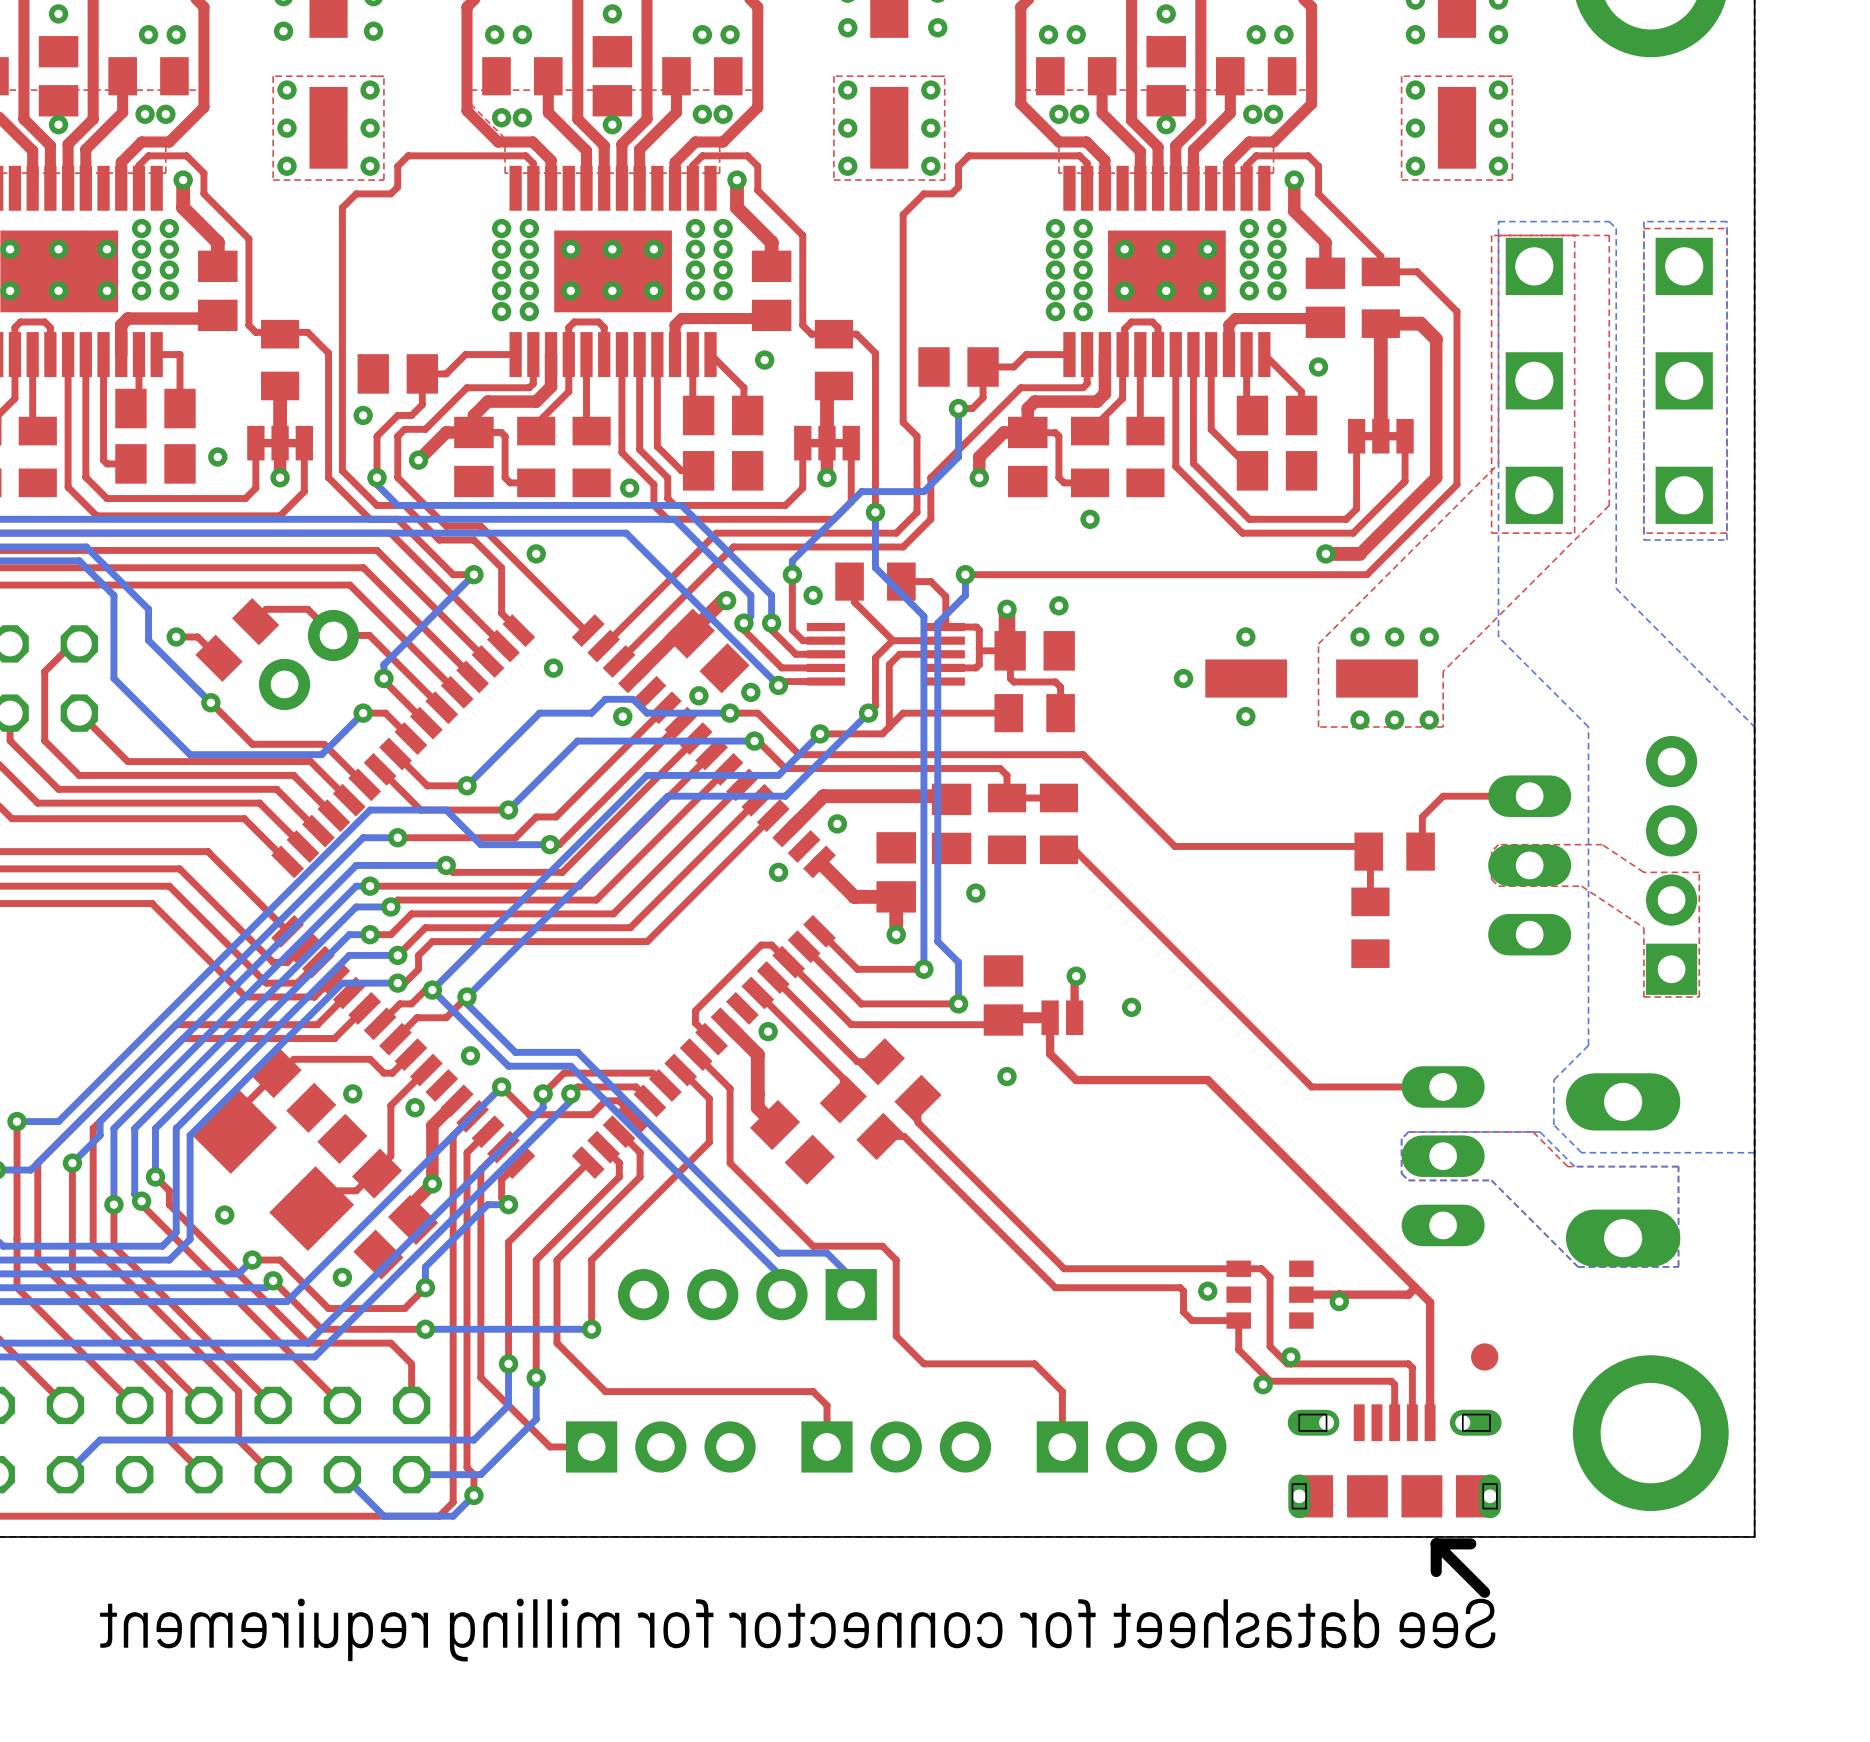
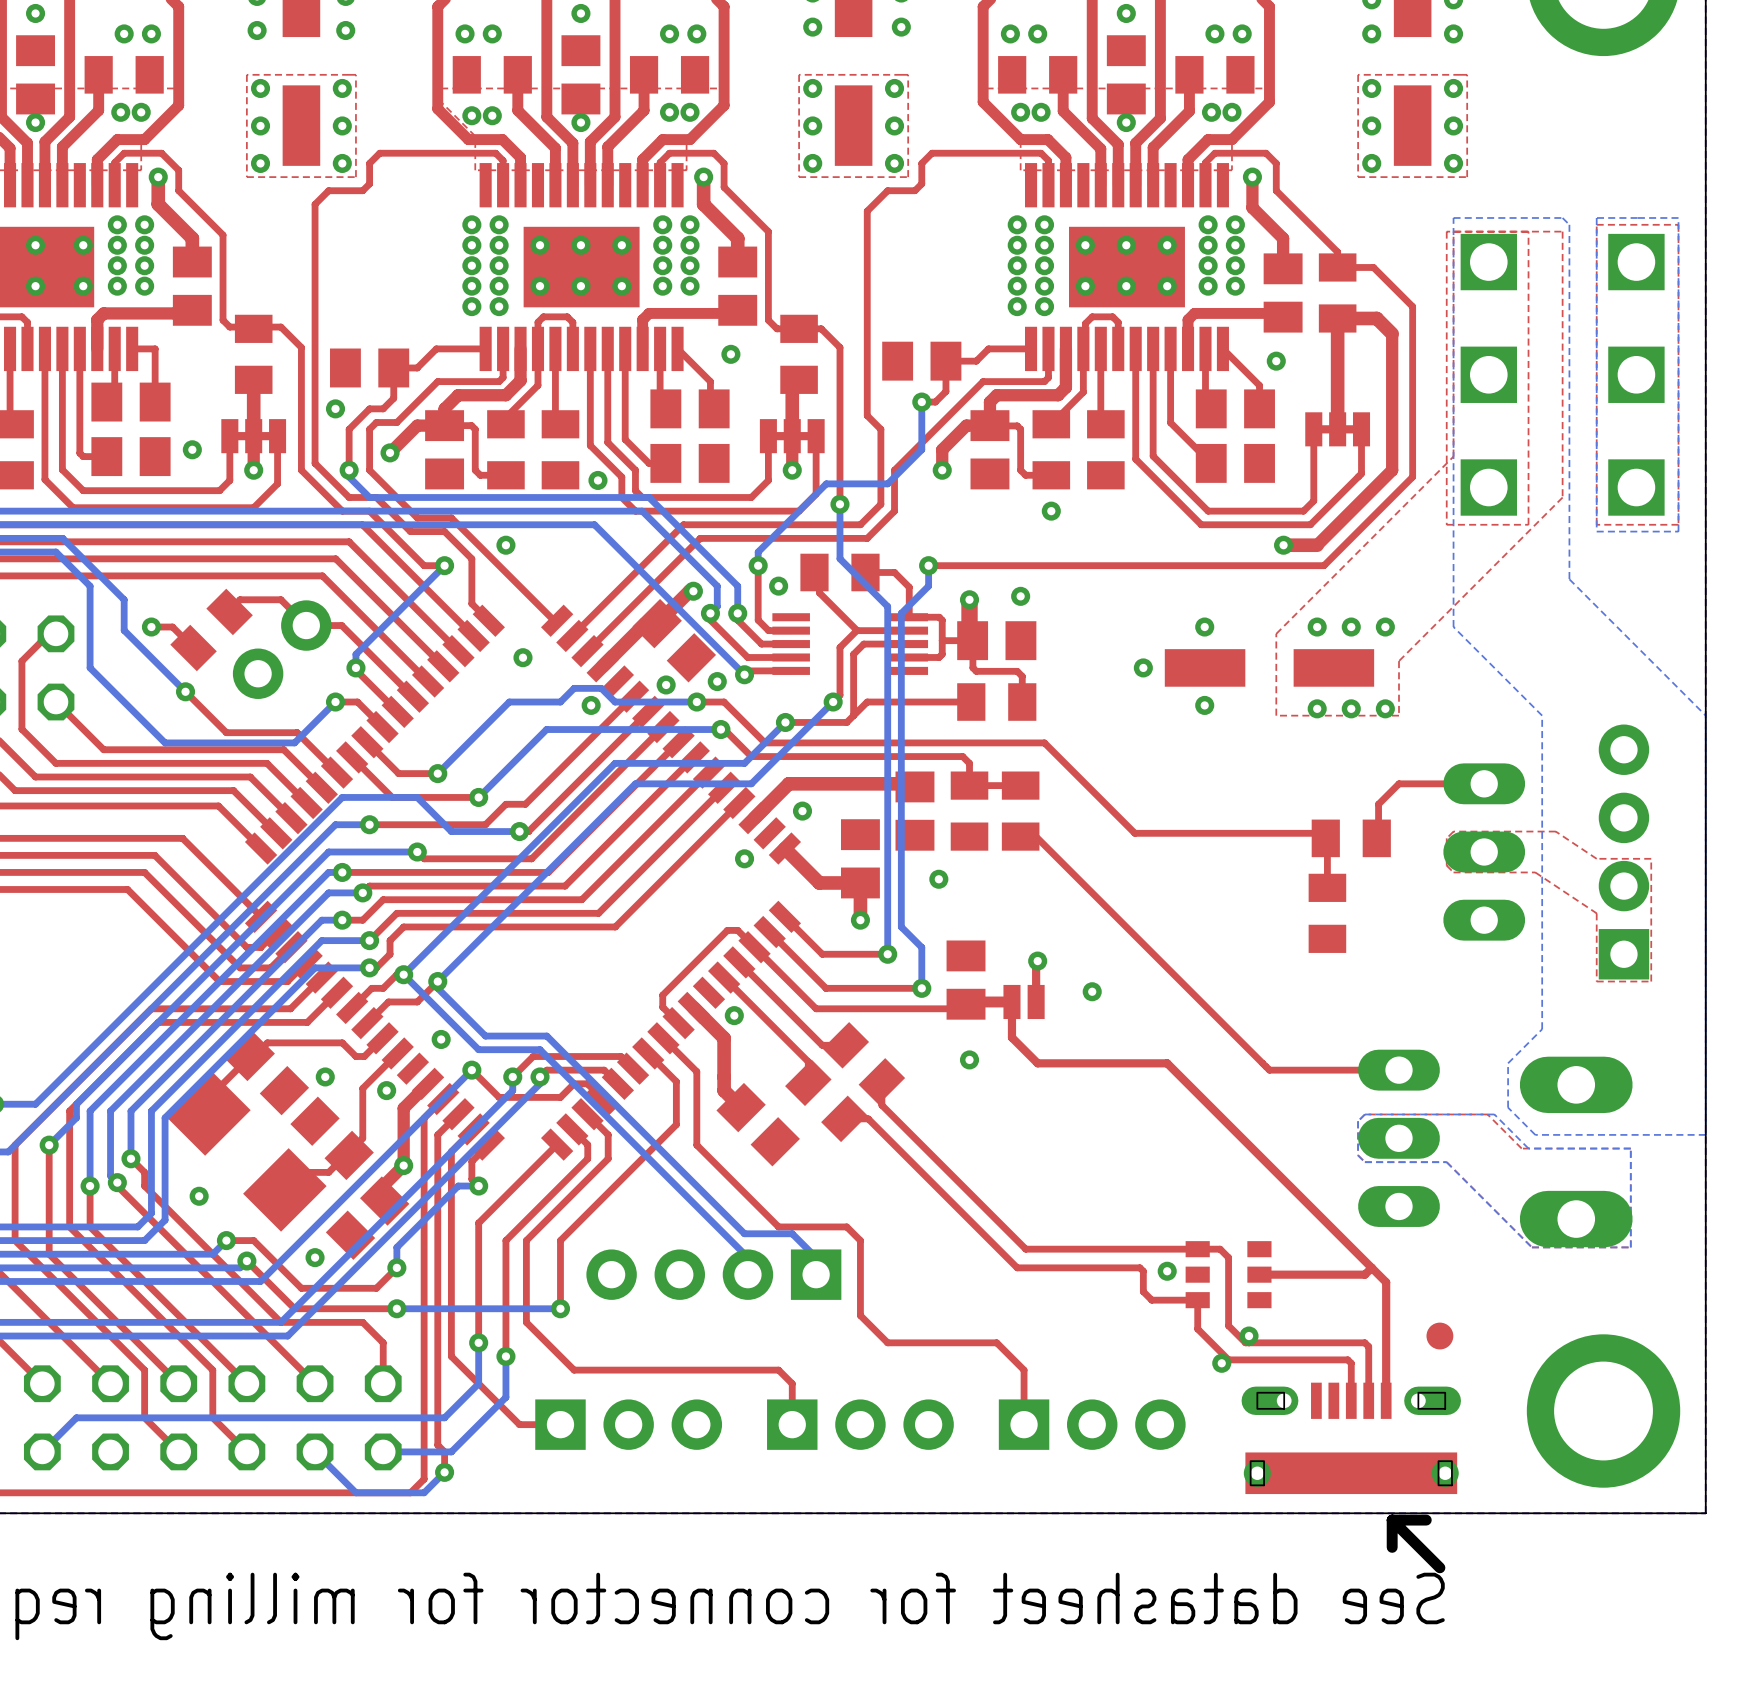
via: (1339, 1301) -> none
part footprint: [1287, 1404, 1502, 1519] -> [1241, 1382, 1461, 1495]

